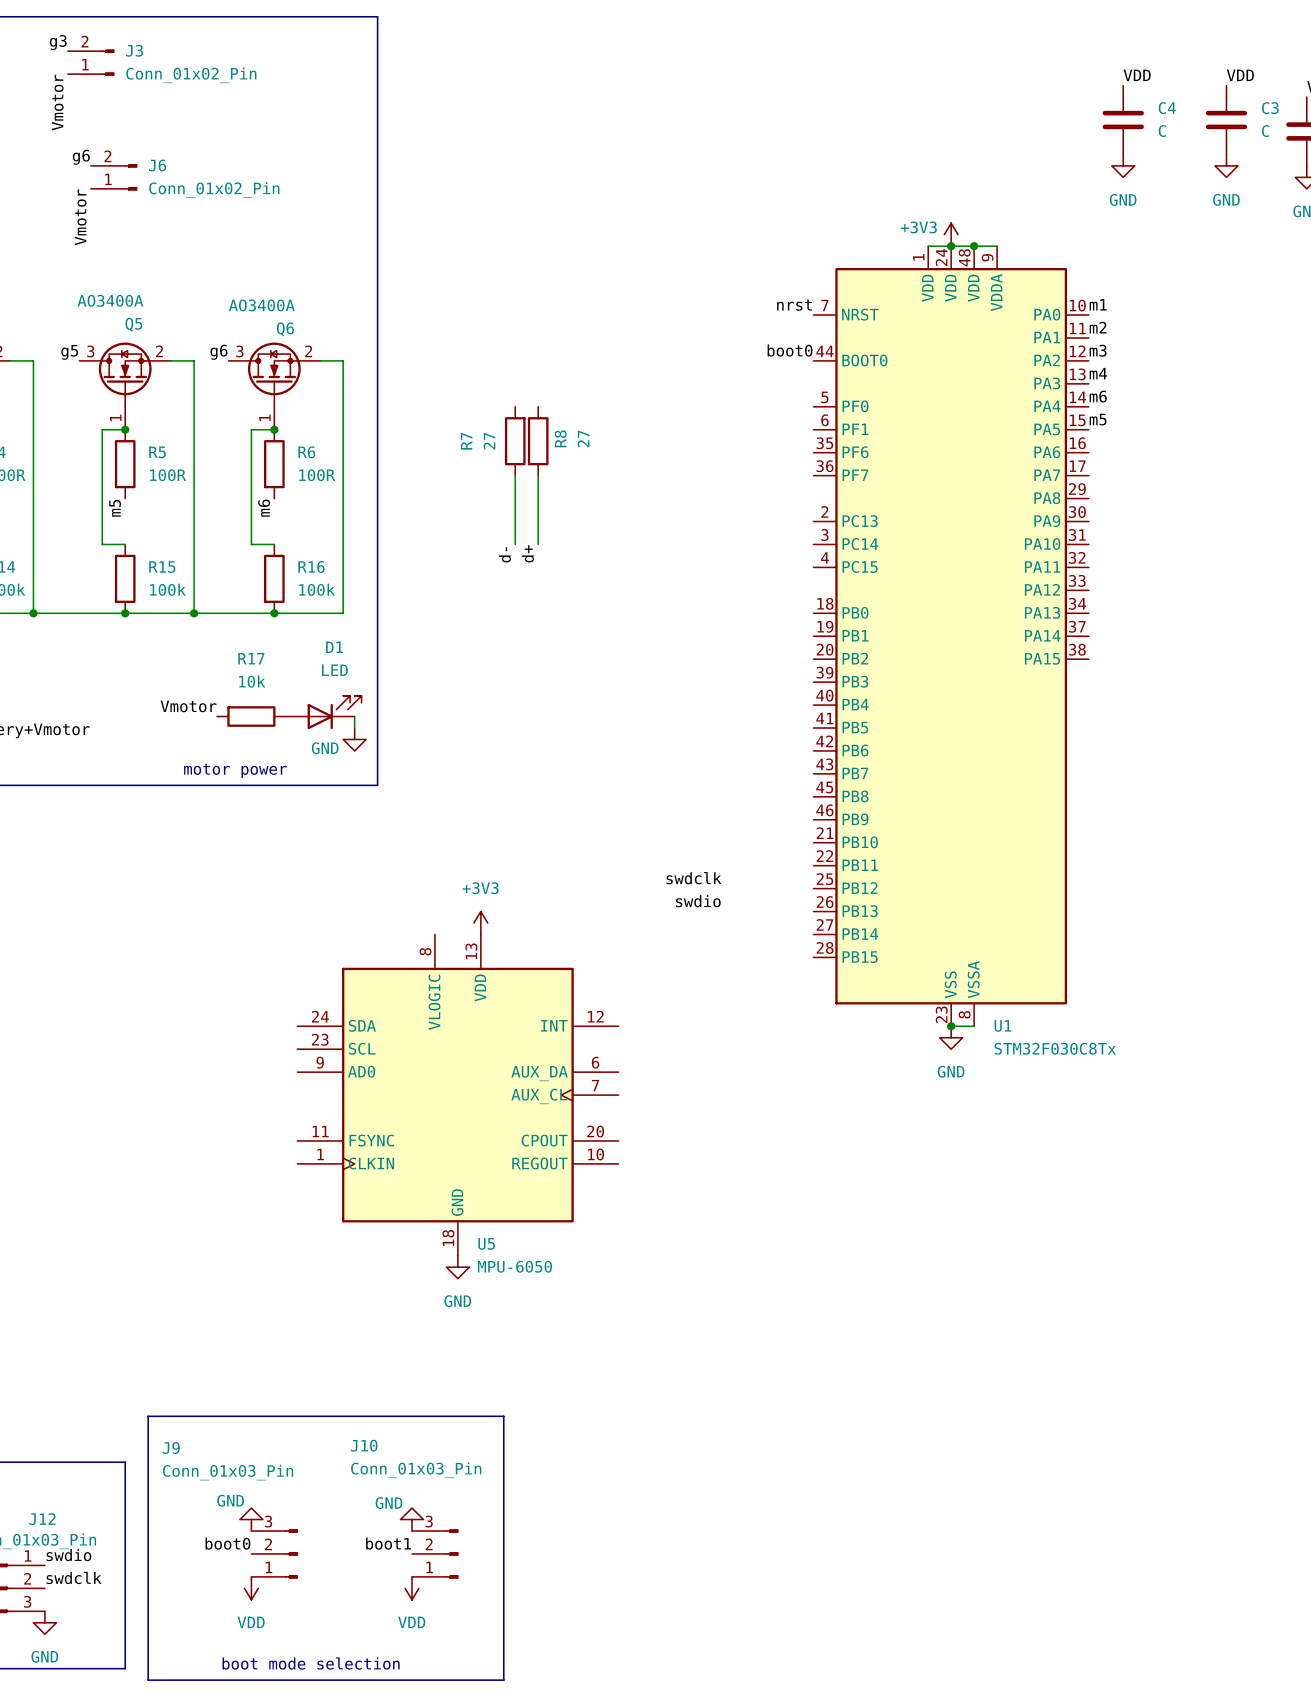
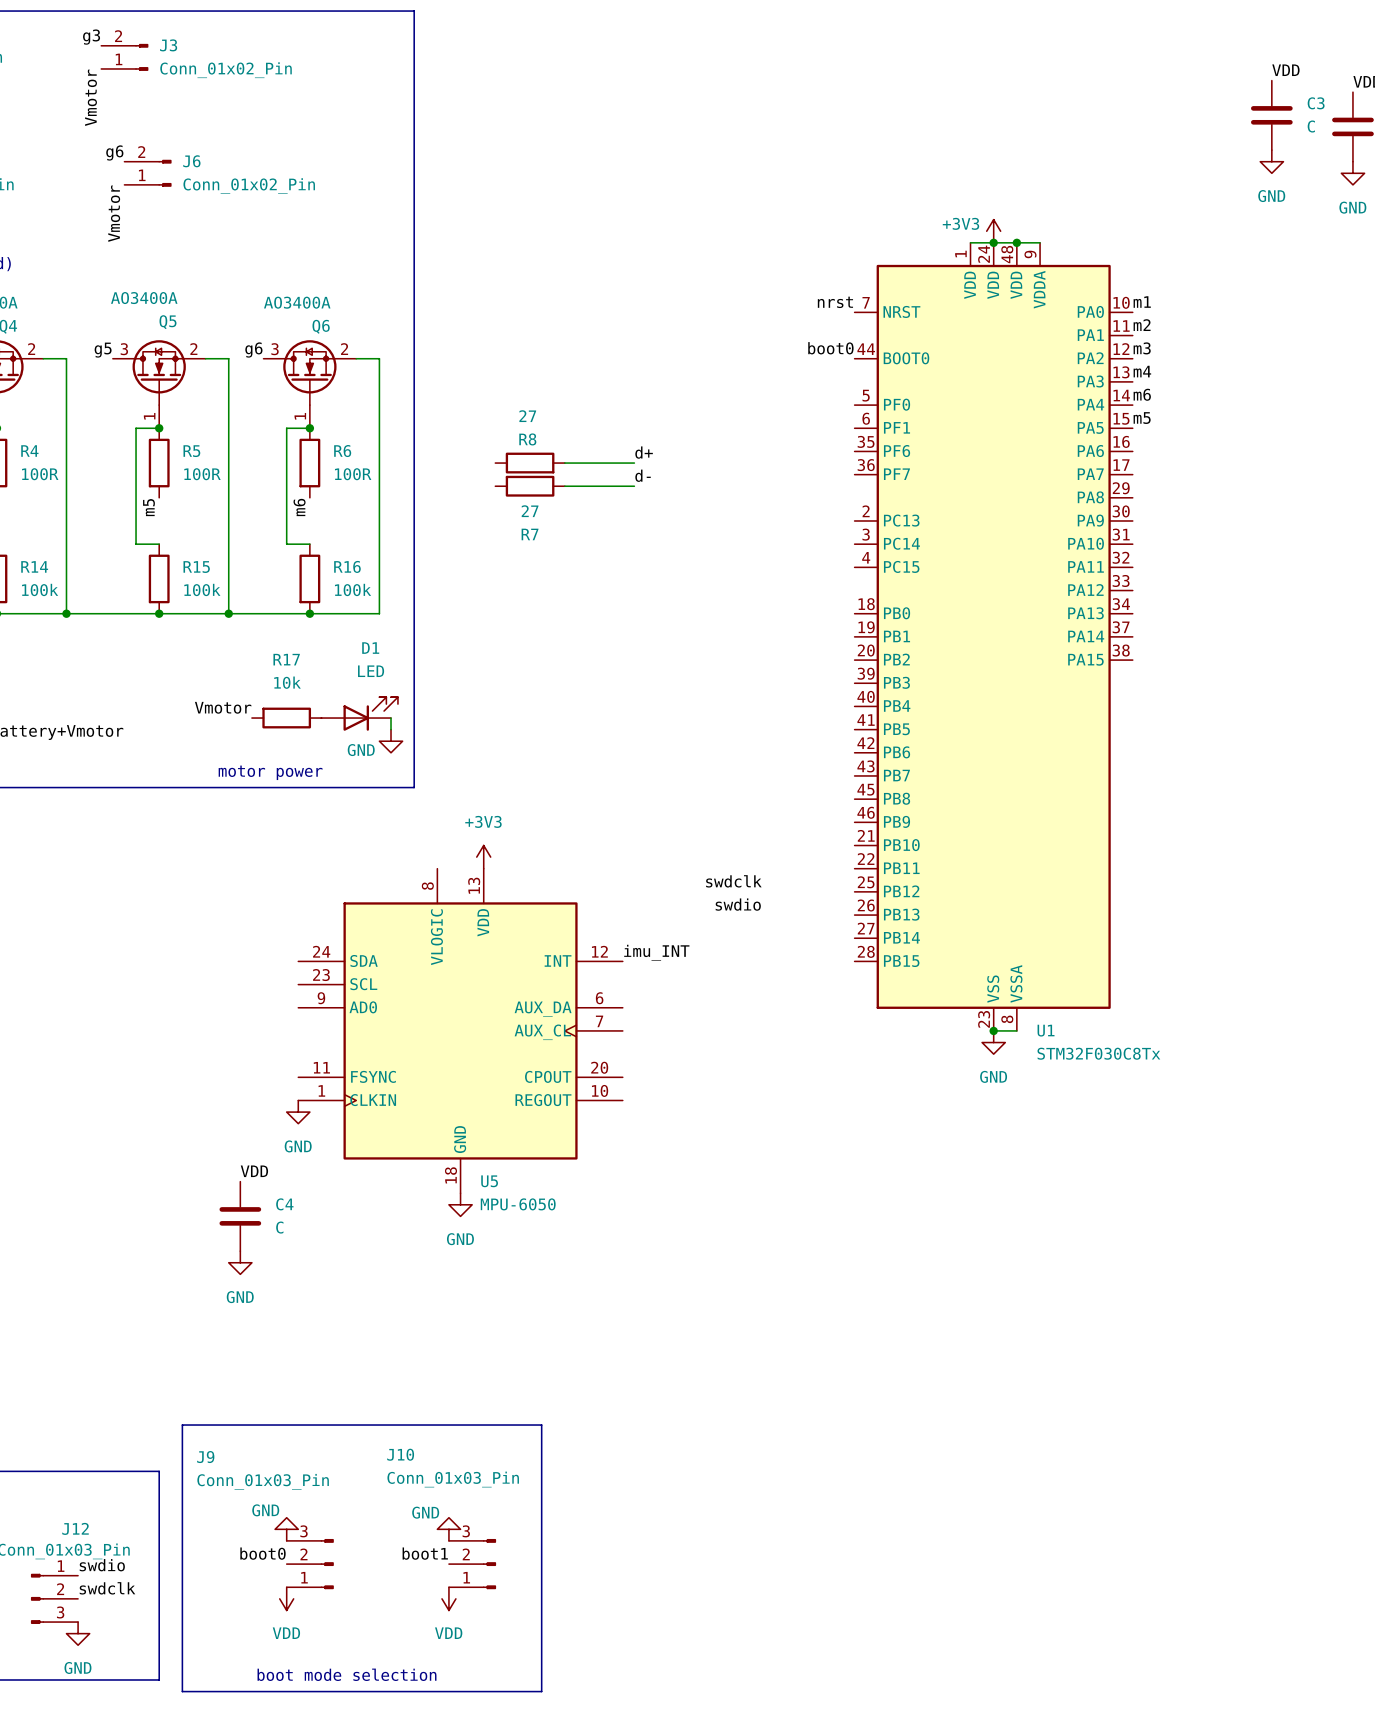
label: VDD (1137, 75) -> none
C4 position: (1123, 120) -> (240, 1216)
power symbol: GND (1123, 165) -> none
R8 name position: R8 (560, 438) -> R8 (527, 439)
R8 value position: 27 (583, 438) -> 27 (527, 416)
R7 name position: R7 (466, 441) -> R7 (530, 534)
R7 value position: 27 (489, 441) -> 27 (530, 511)
R7 rotation: 0° (515, 441) -> 90° clockwise (530, 486)
R7 position: (515, 441) -> (530, 486)
R8 rotation: 0° (538, 441) -> 90° clockwise (530, 463)
R8 position: (538, 441) -> (530, 463)
wire: none -> (564, 463) (634, 463)
wire: (515, 475) (515, 544) -> none
wire: (538, 475) (538, 544) -> none
wire: none -> (564, 486) (634, 486)
label rotation: 0° (527, 553) -> 90° clockwise (644, 452)
label position: d+ (527, 553) -> d+ (644, 452)
label rotation: 0° (504, 554) -> 90° clockwise (643, 475)
label position: d- (504, 554) -> d- (643, 475)
power symbol position: +3V3 (480, 923) -> +3V3 (483, 857)
label: none -> imu_INT (656, 952)
U5 position: (457, 1095) -> (460, 1030)
power symbol: none -> GND (298, 1112)
label: none -> VDD (254, 1171)
power symbol: none -> GND (240, 1262)
power symbol position: GND (457, 1267) -> GND (460, 1204)

